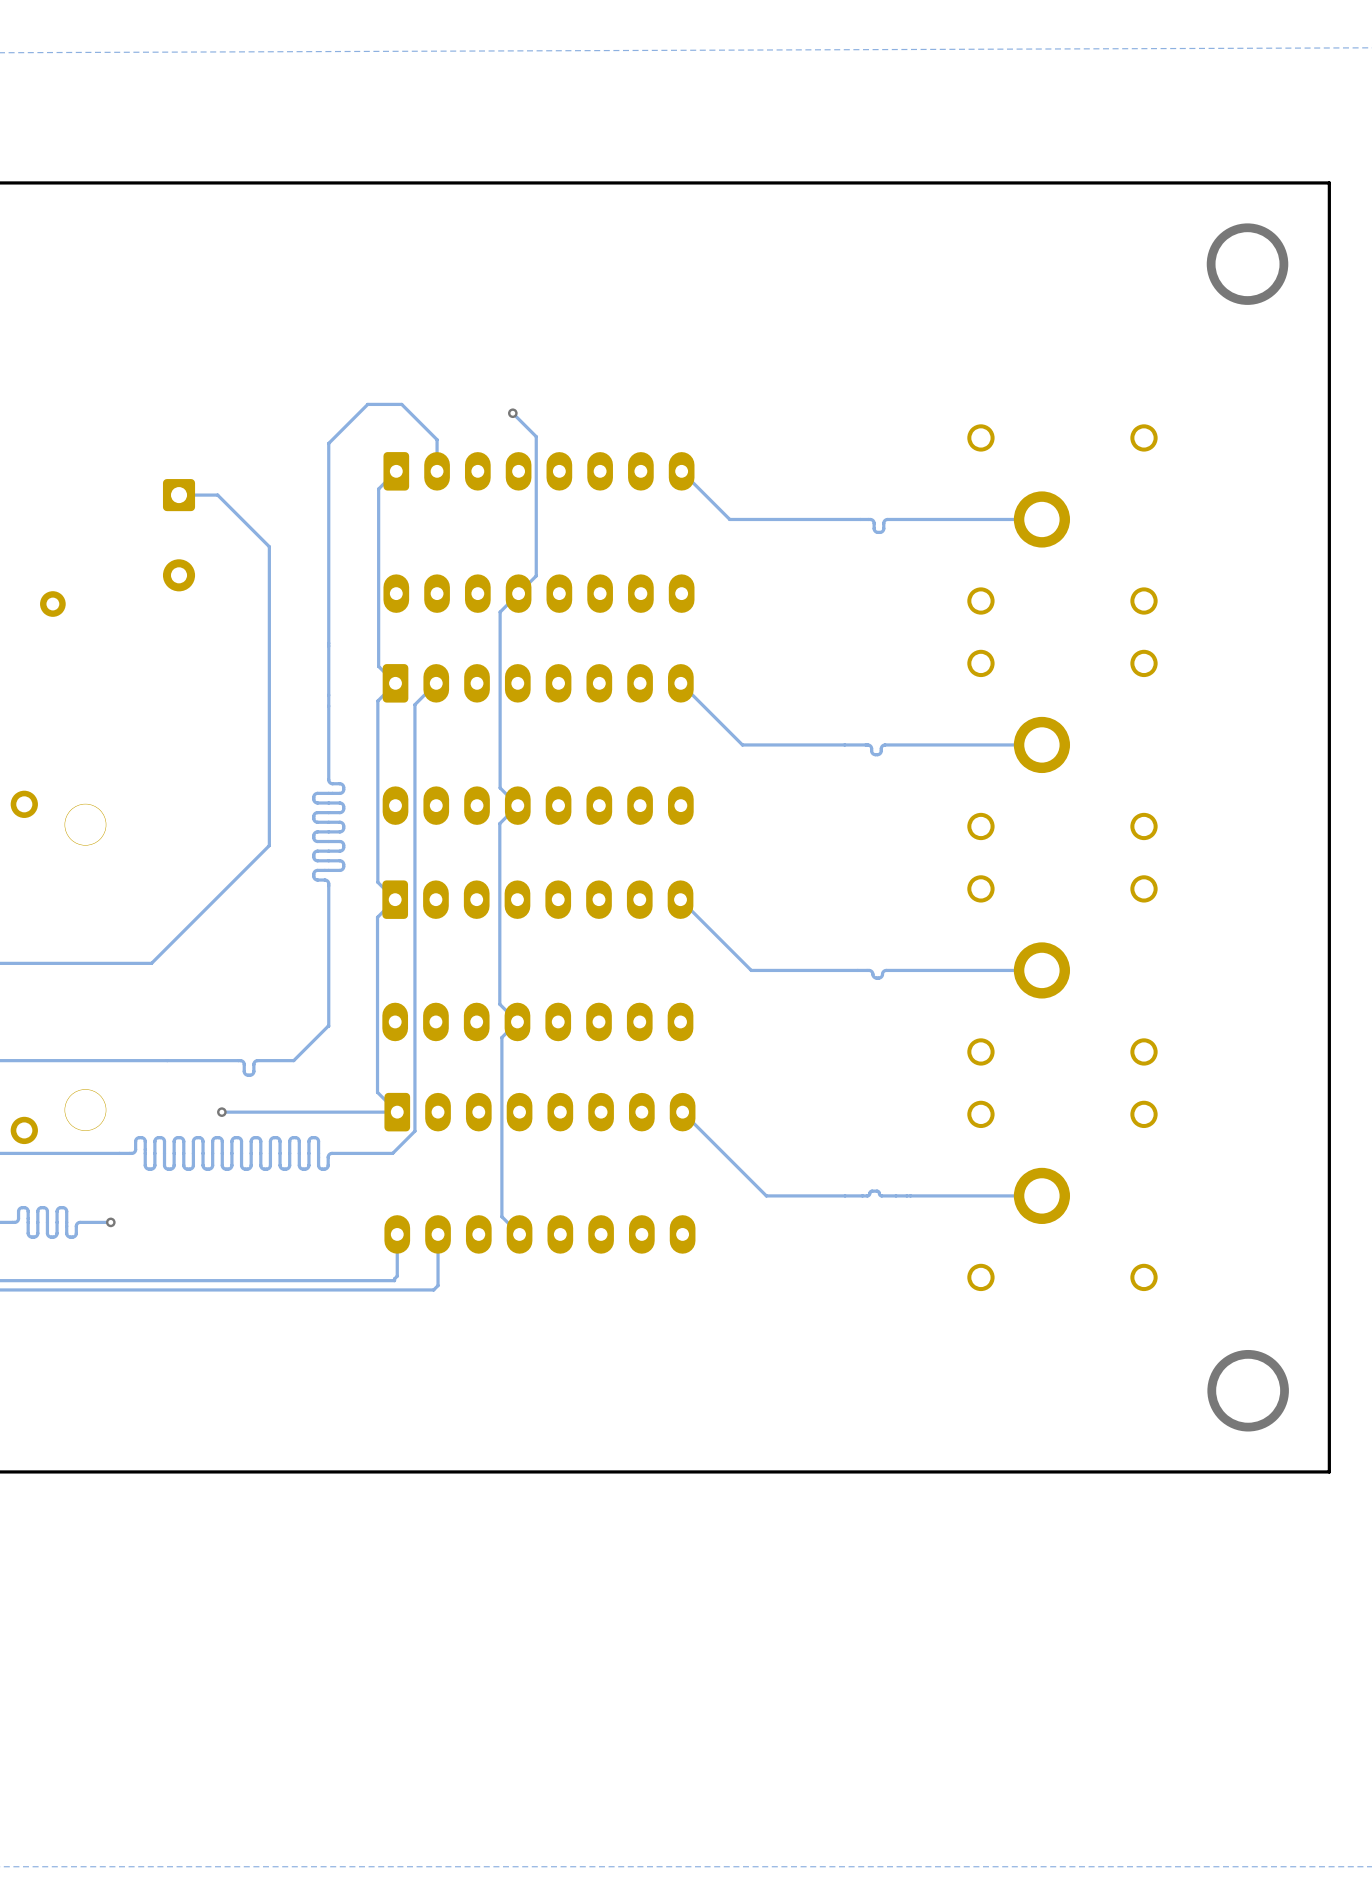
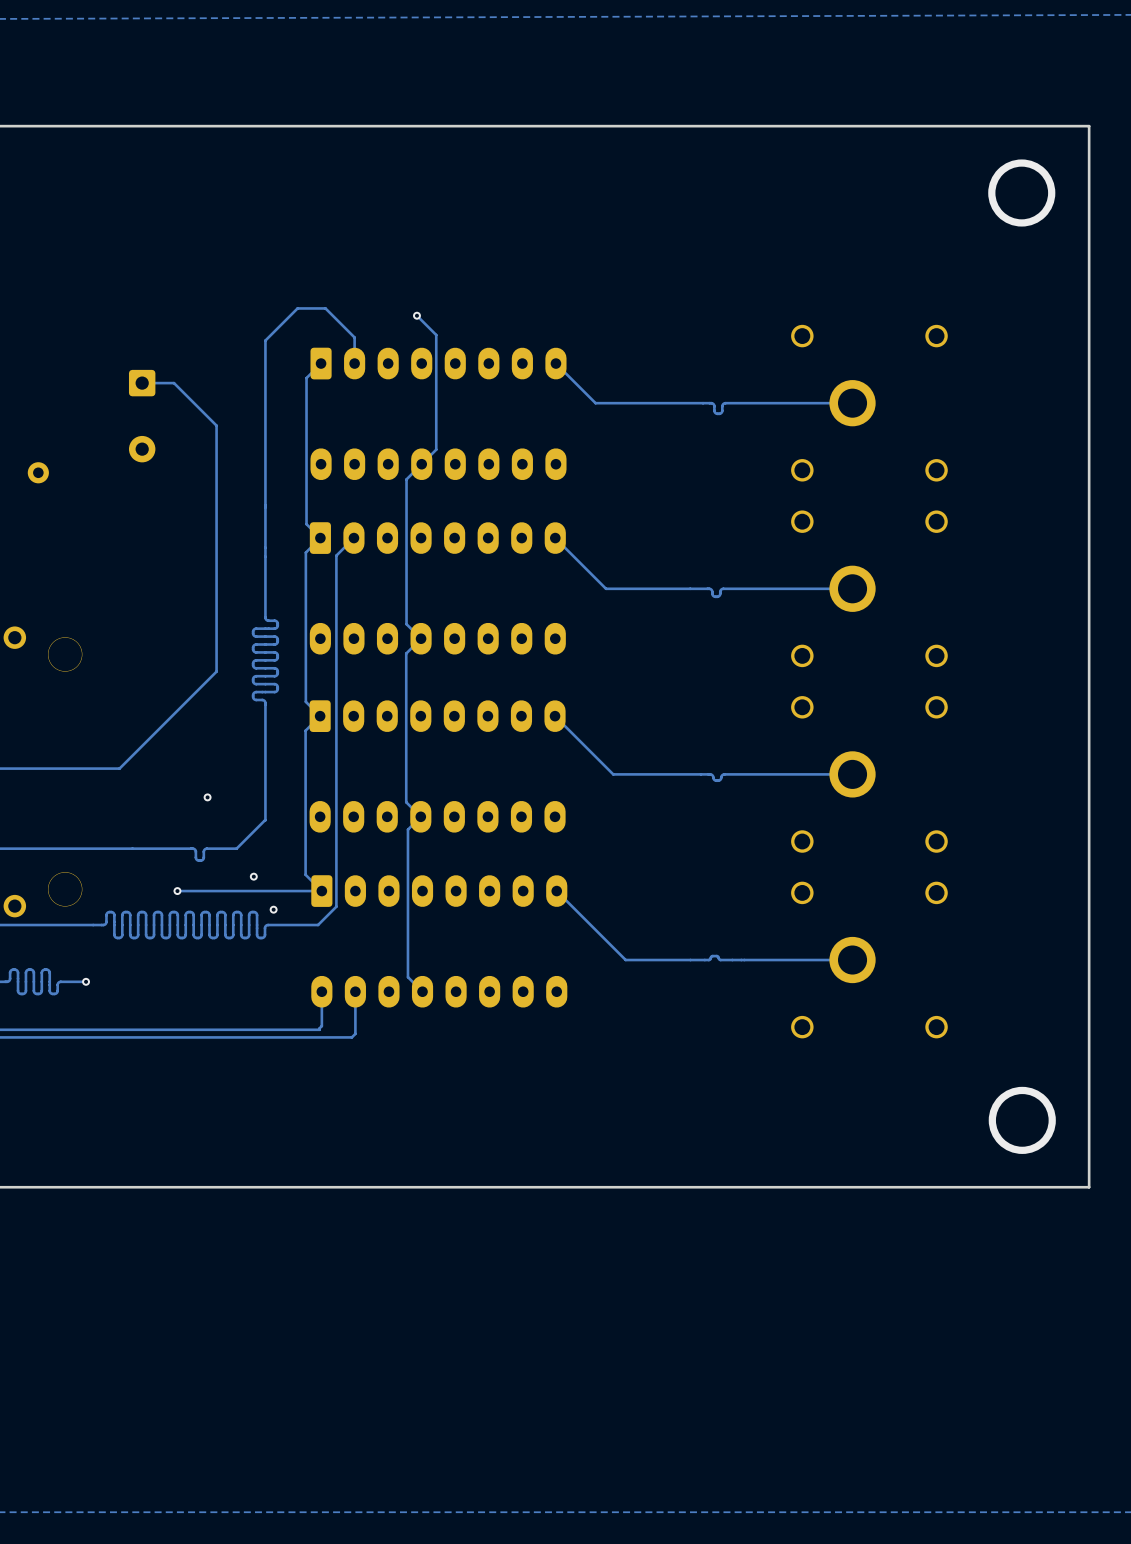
via: none -> (207, 797)
via: none -> (253, 876)
via: none -> (273, 909)

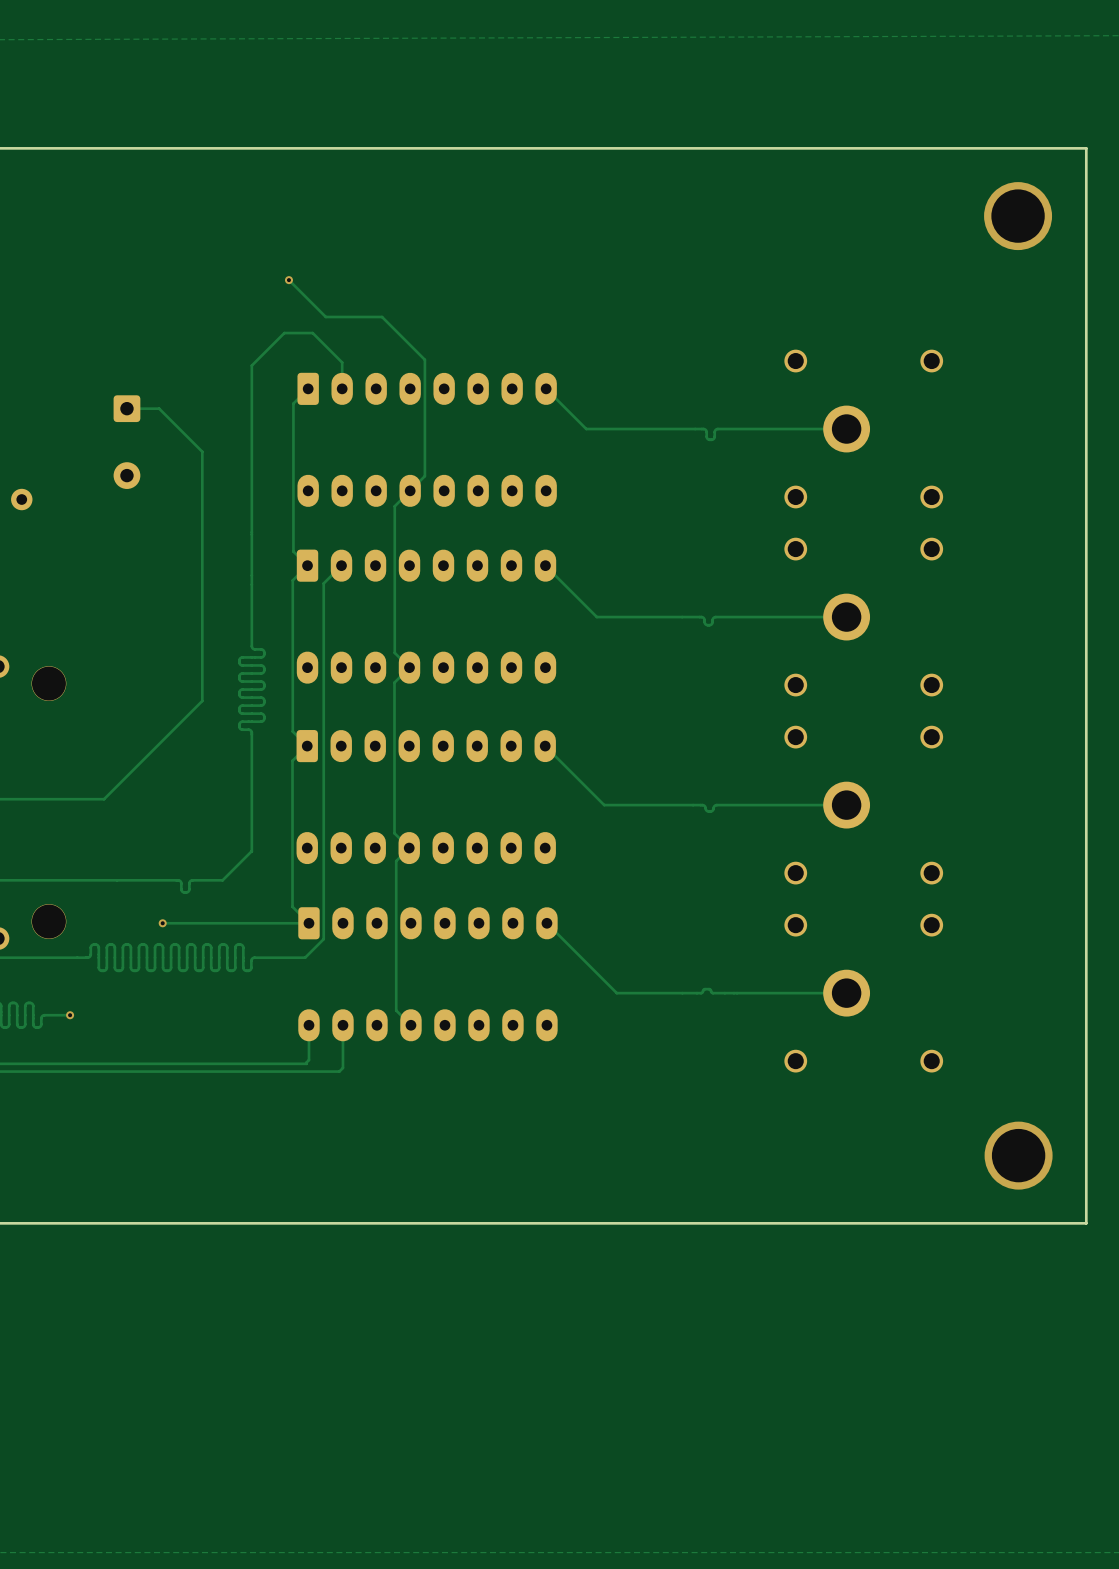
via: none -> (288, 280)
track: (416, 315) (436, 335) -> (288, 280) (325, 316) (382, 316) (424, 359)
via: (416, 315) -> none
via: (207, 797) -> none
via: (253, 876) -> none
via: (273, 909) -> none

